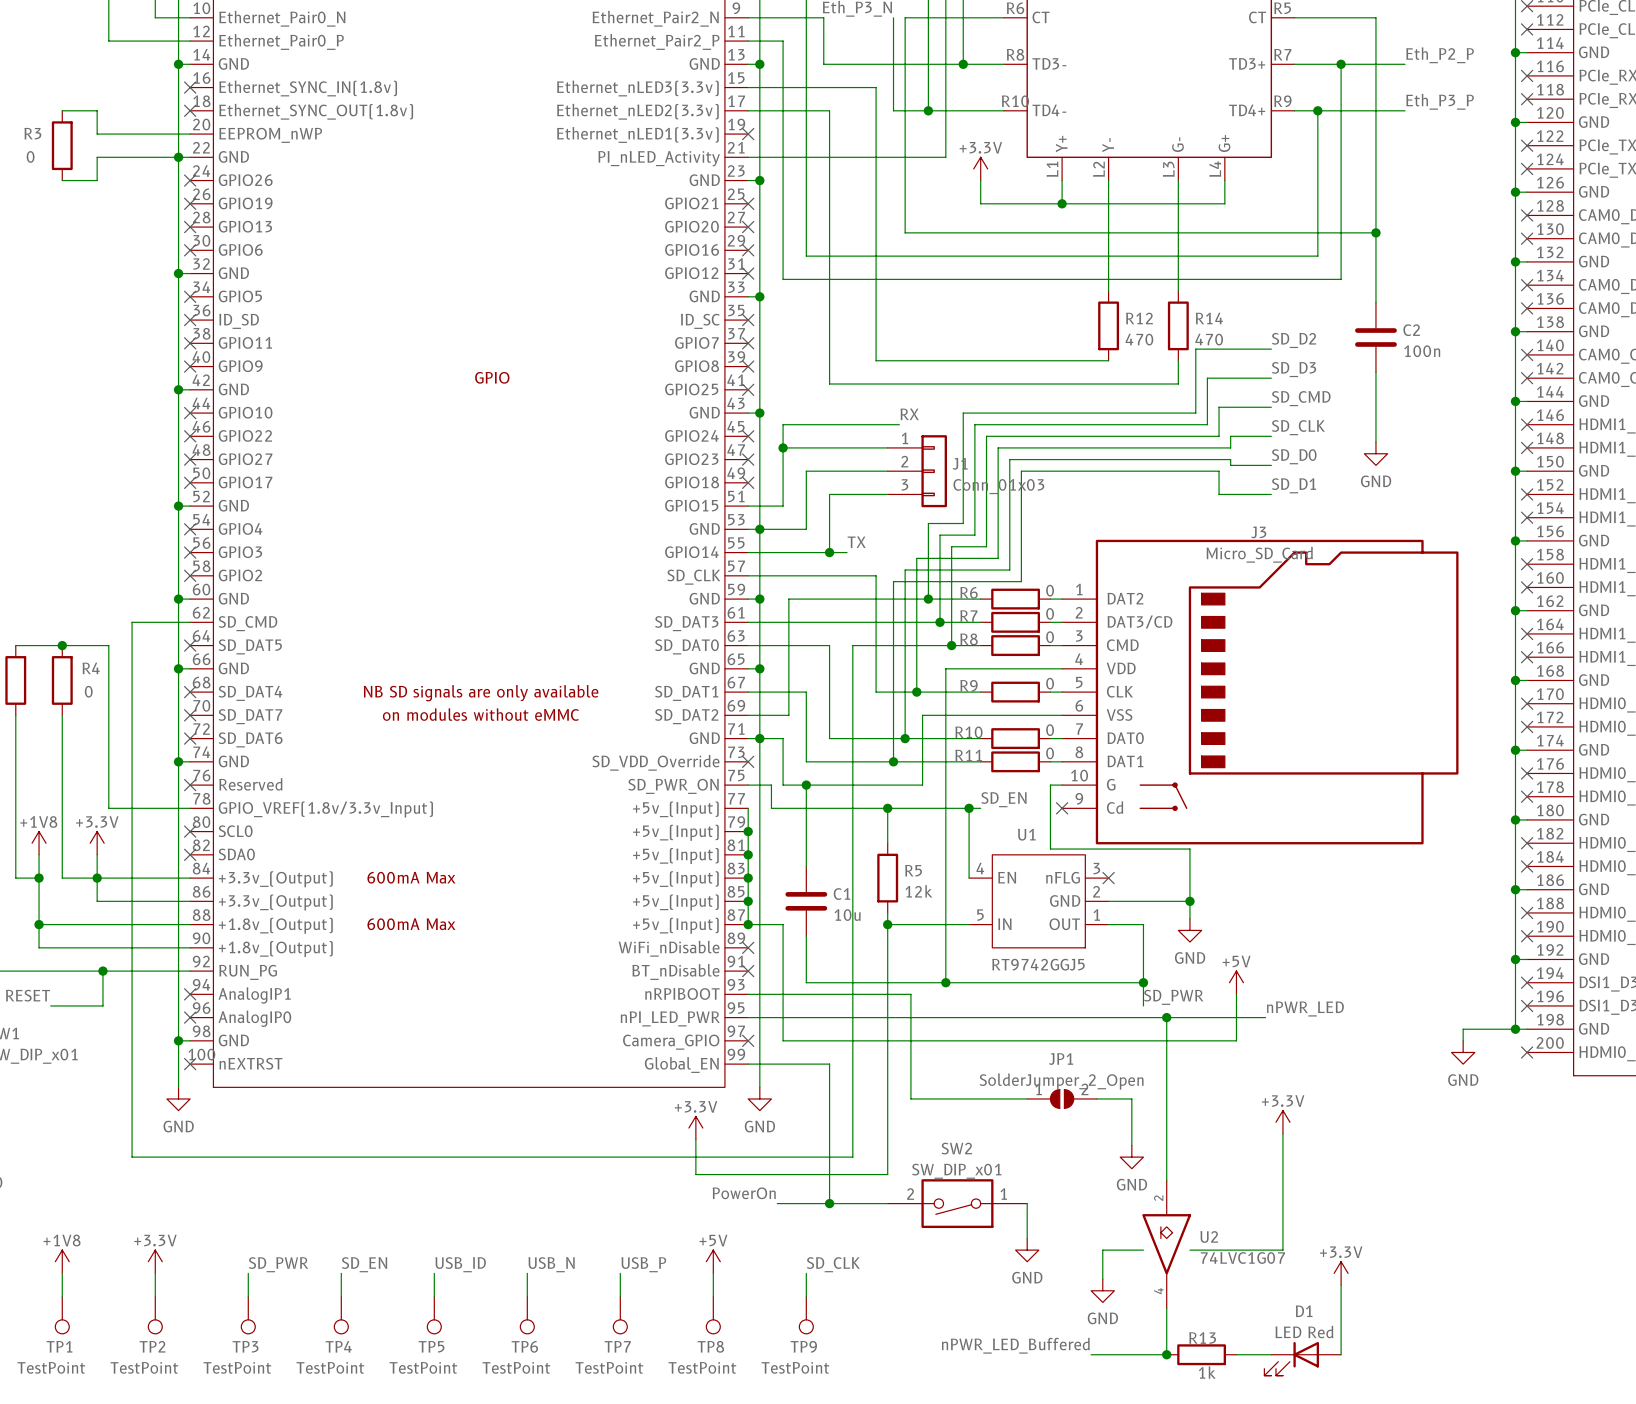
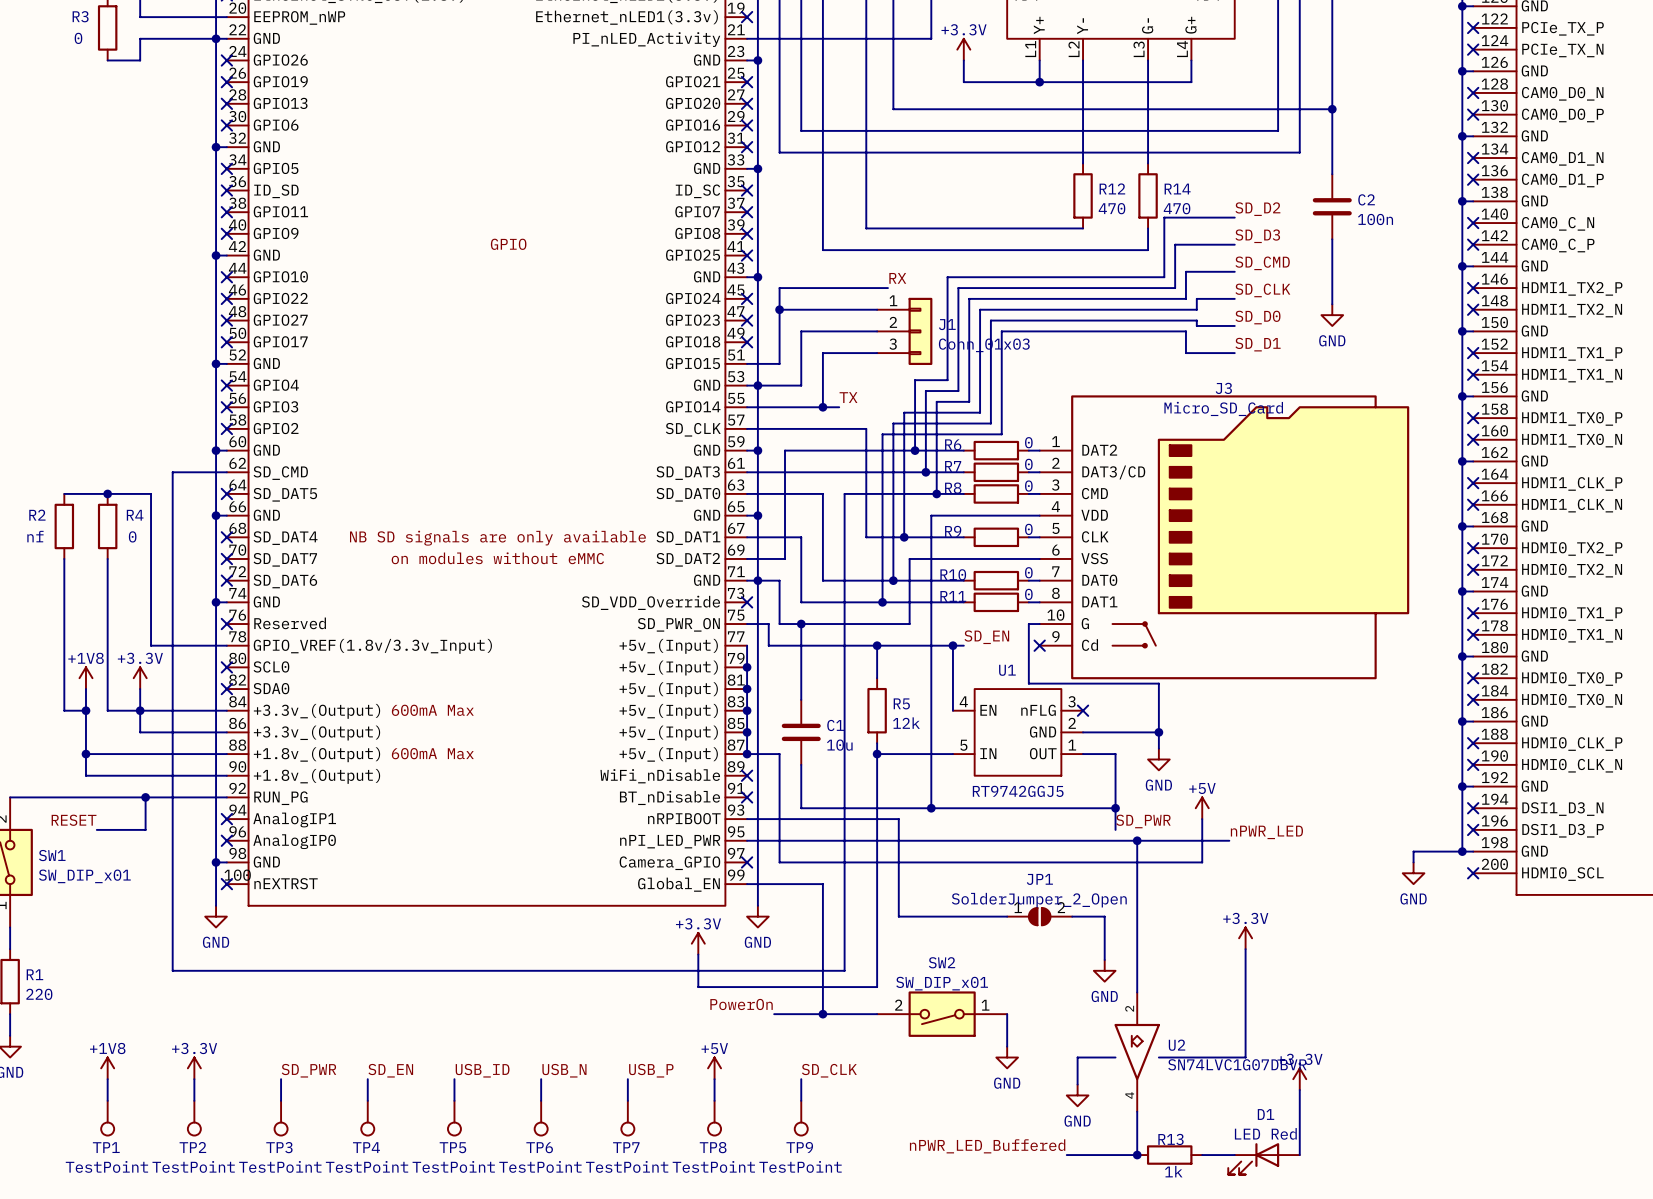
U2 value: 74LVC1G07 (1242, 1258) -> SN74LVC1G07DBVR (1237, 1064)

